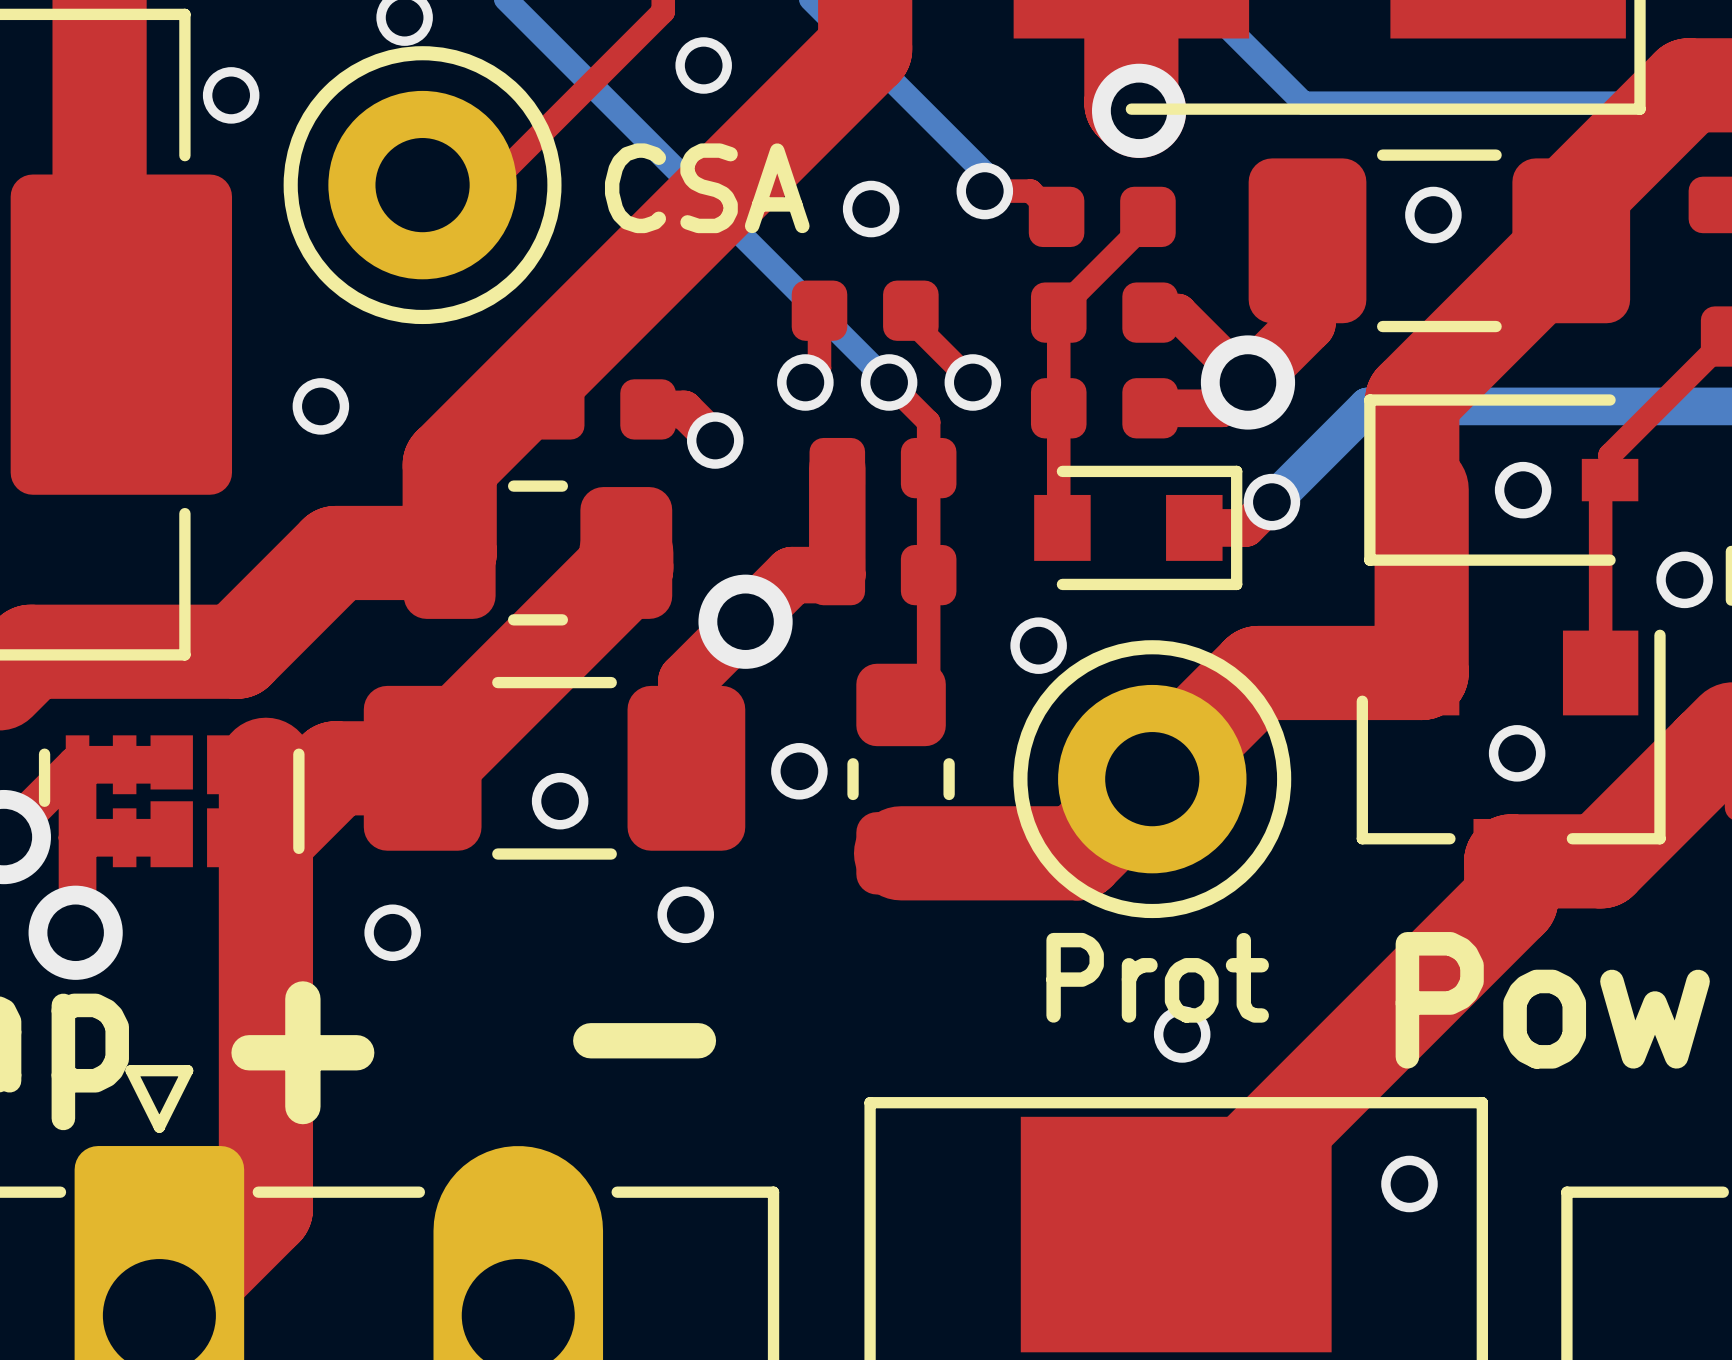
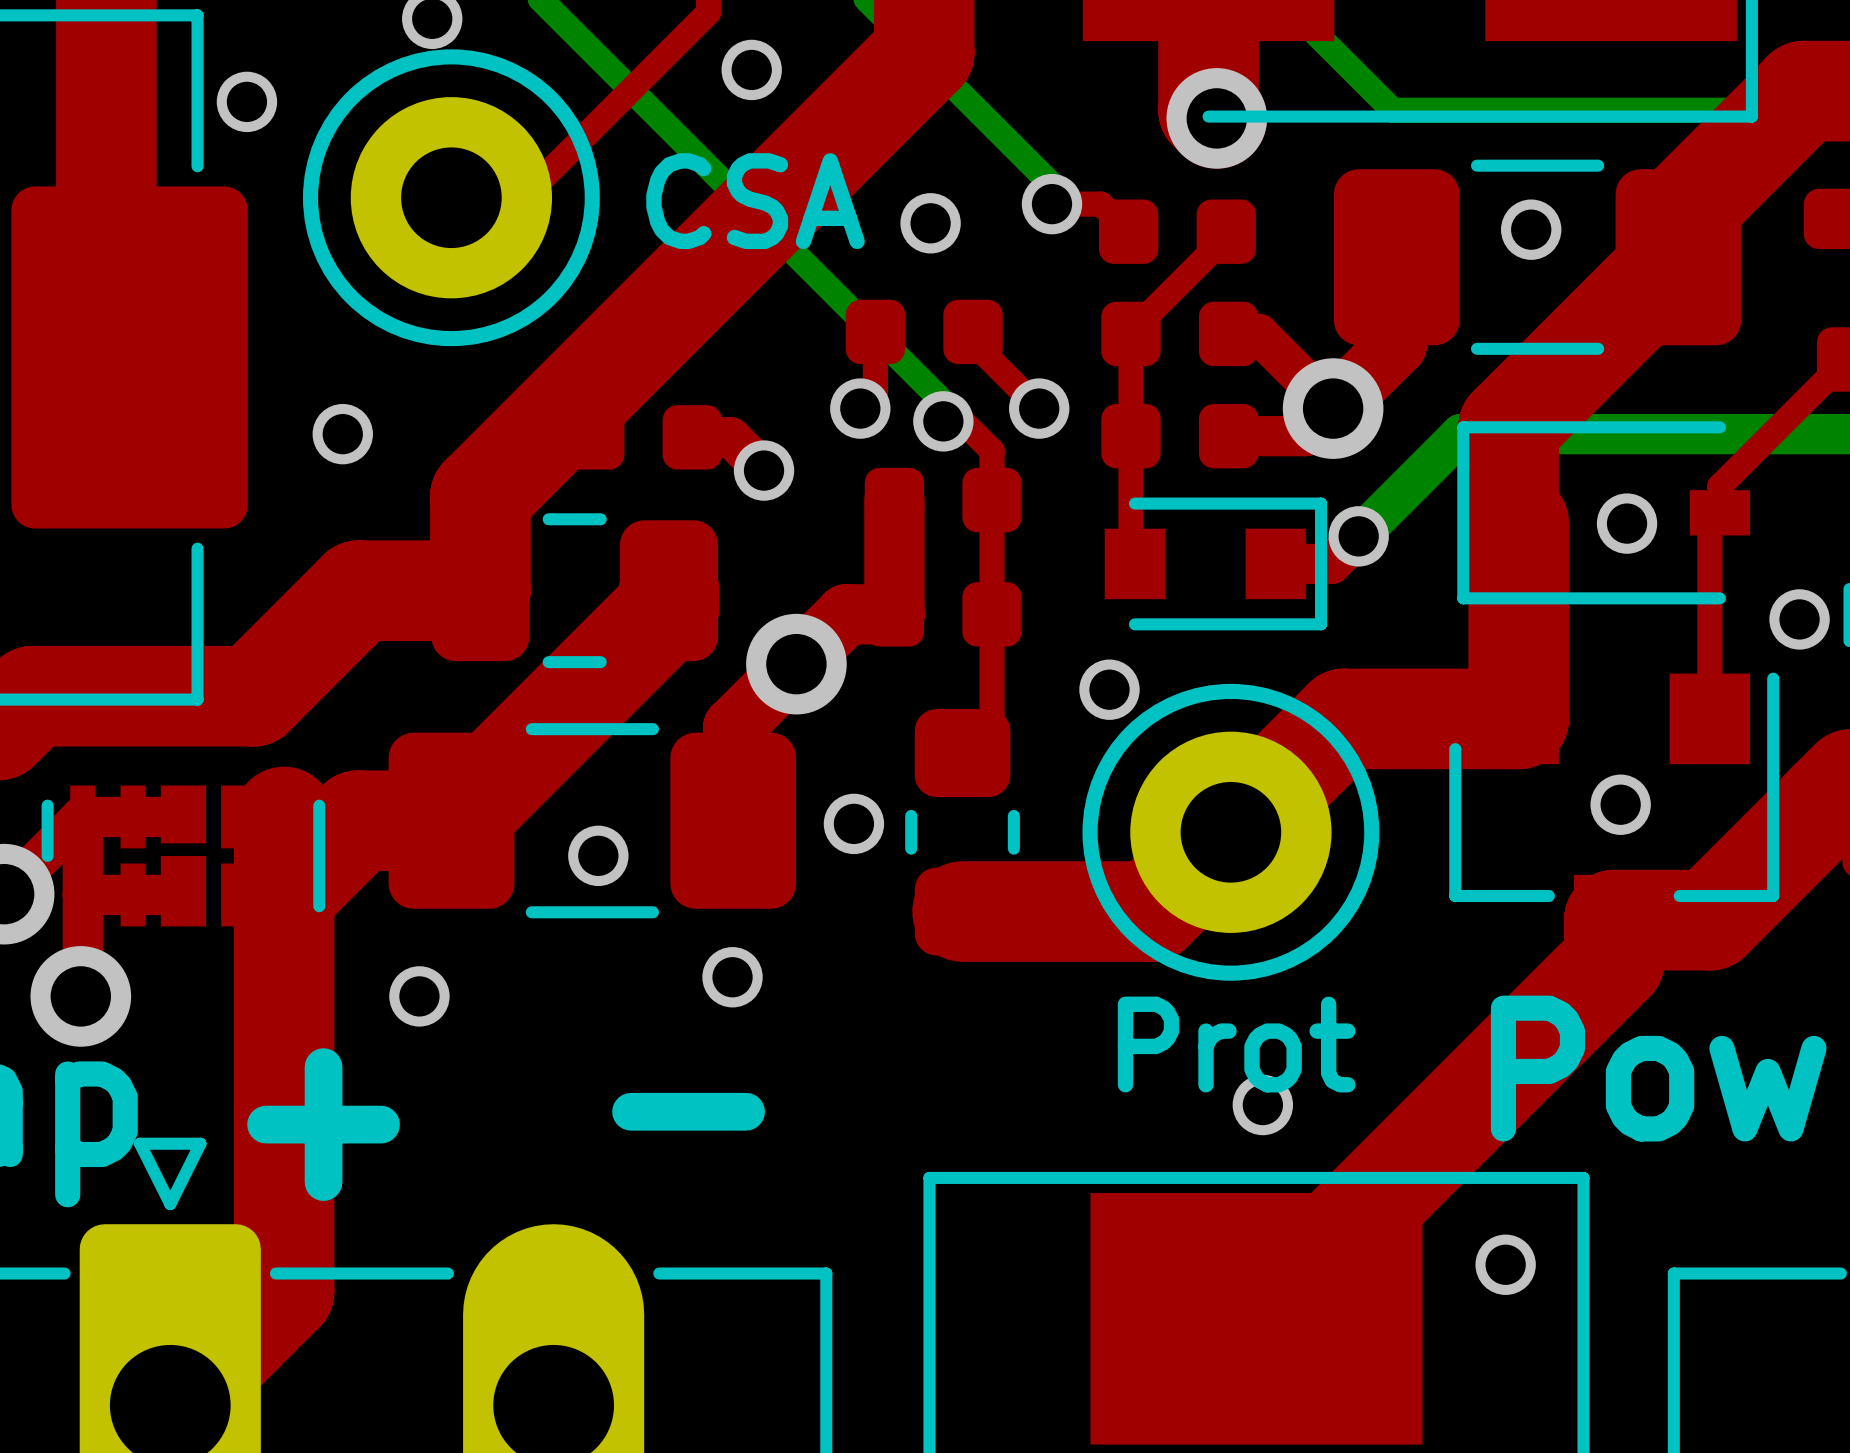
via position: (889, 382) -> (943, 421)

